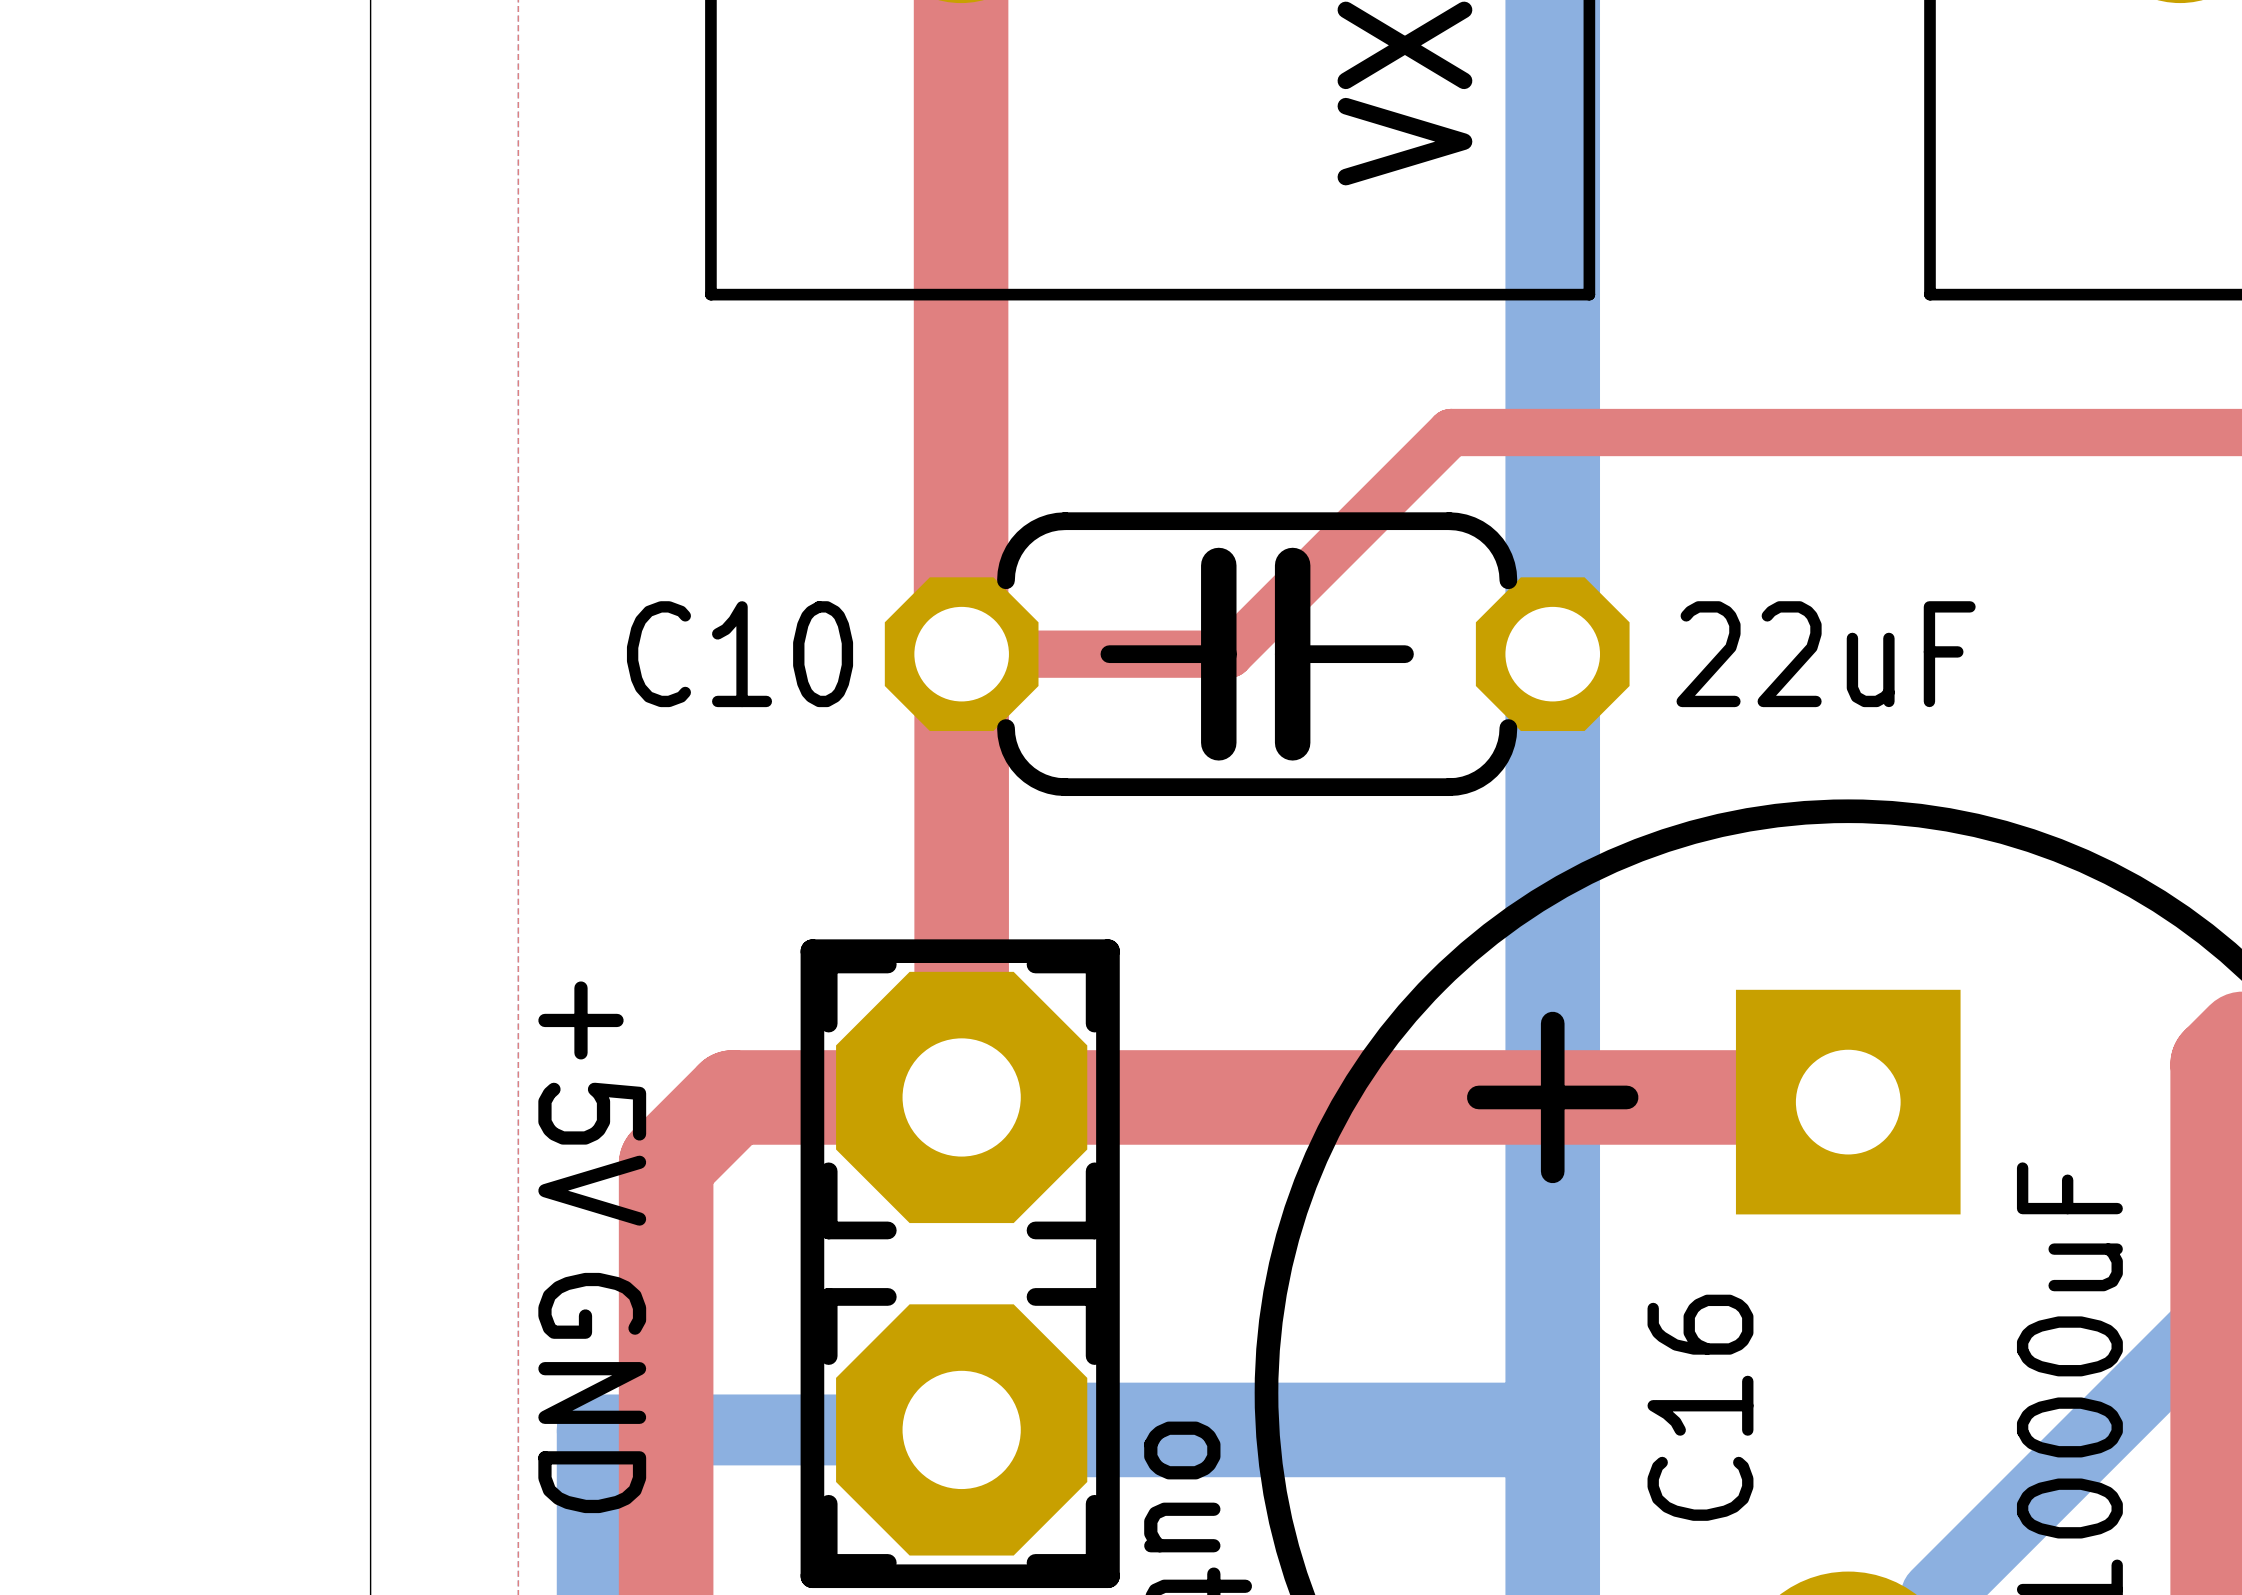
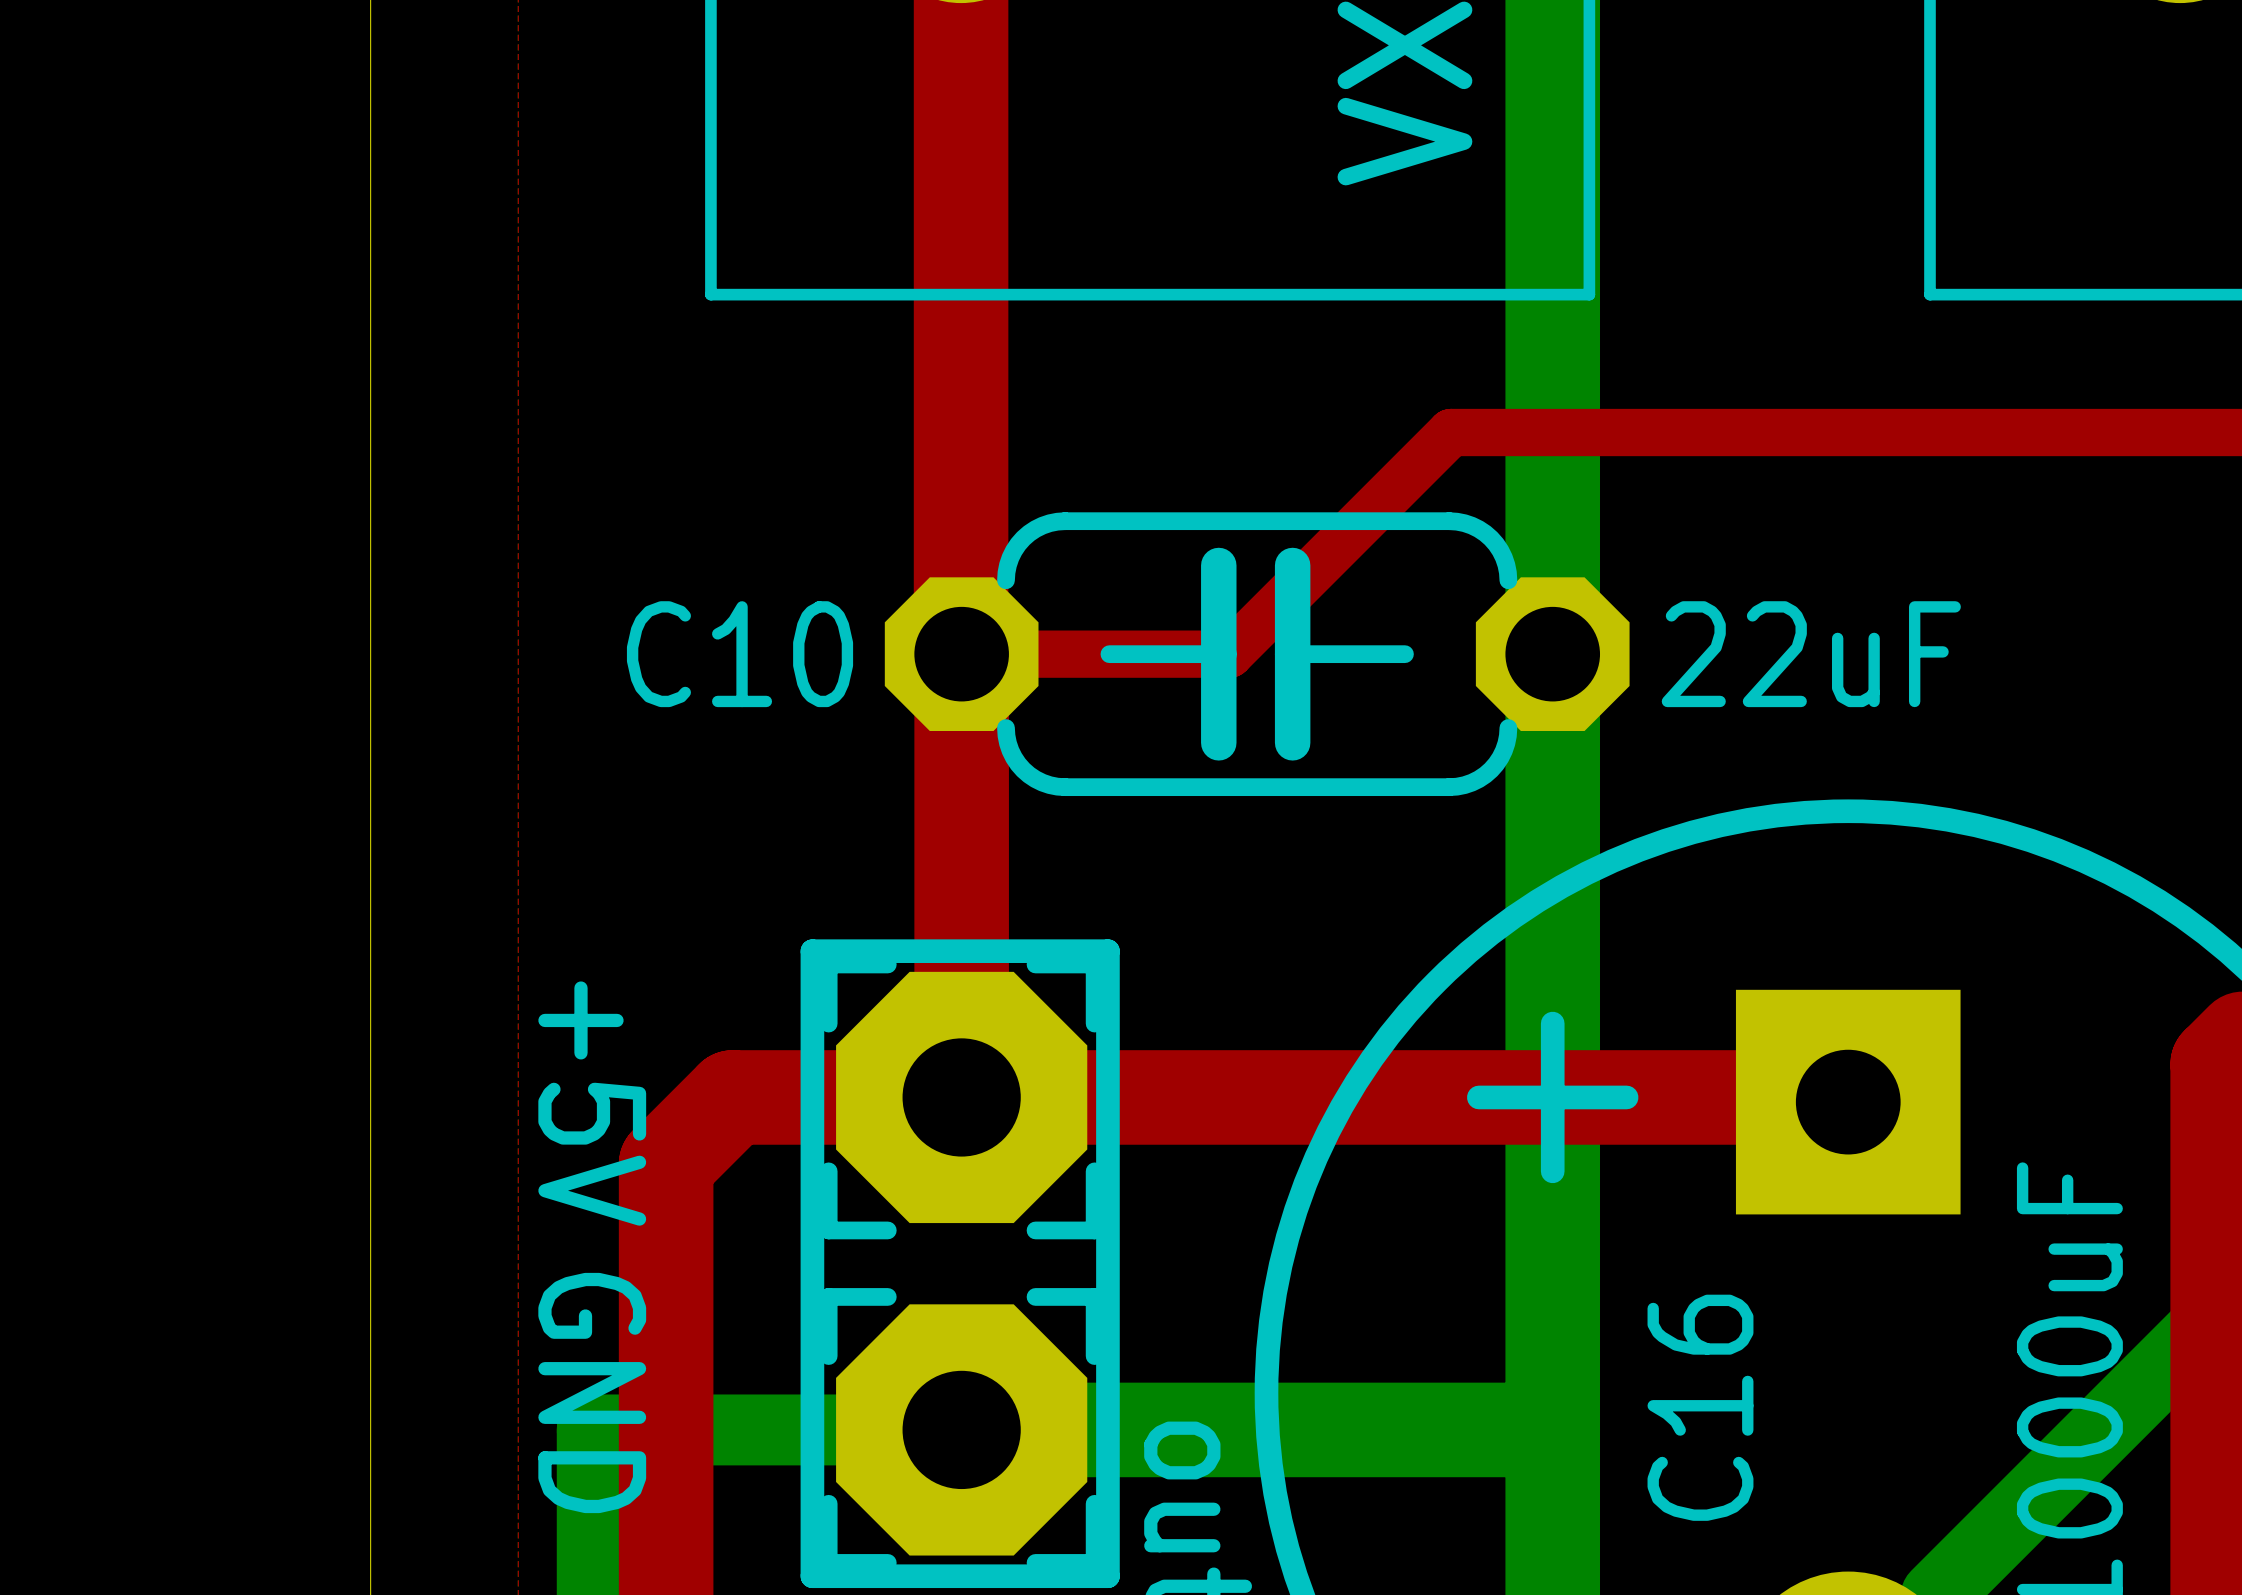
C10 value position: 22uF (1826, 654) -> 22uF (1811, 654)

